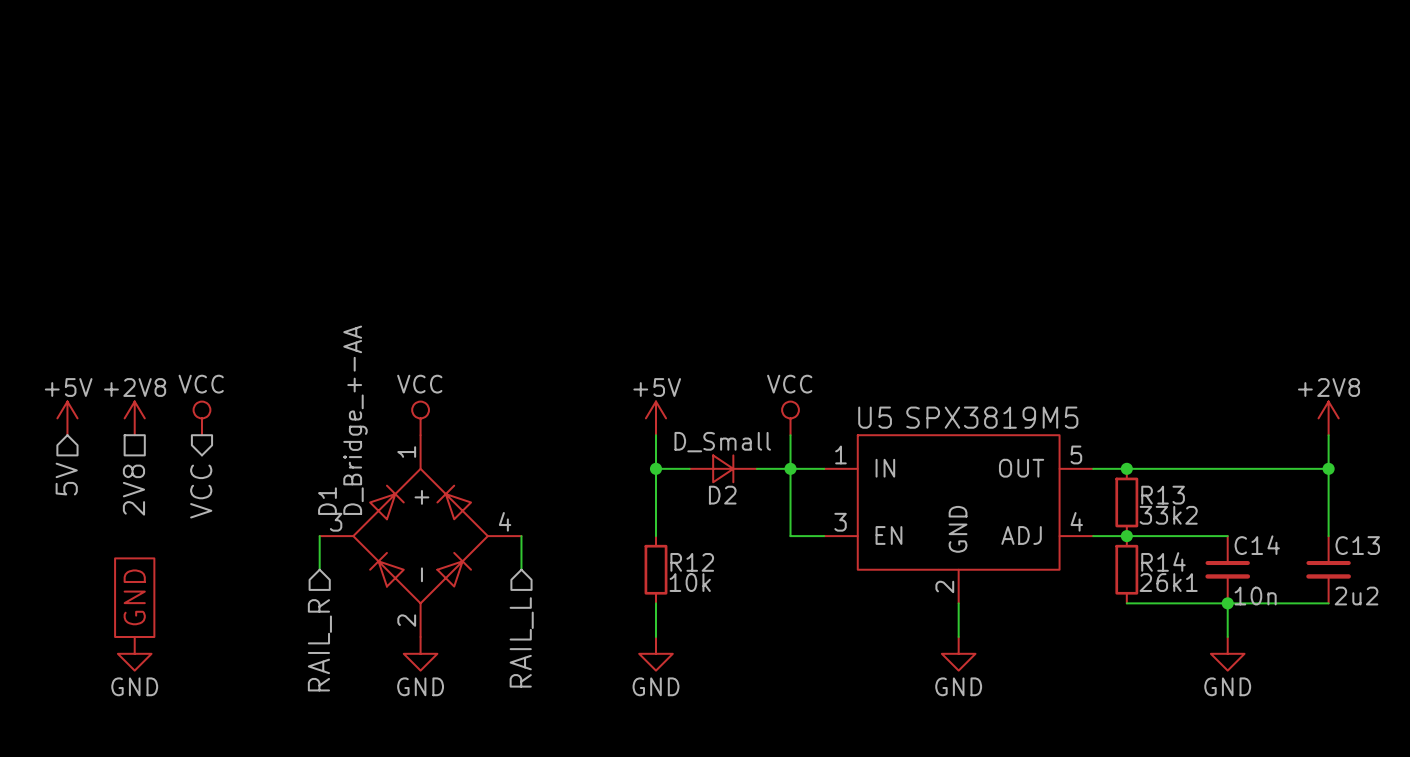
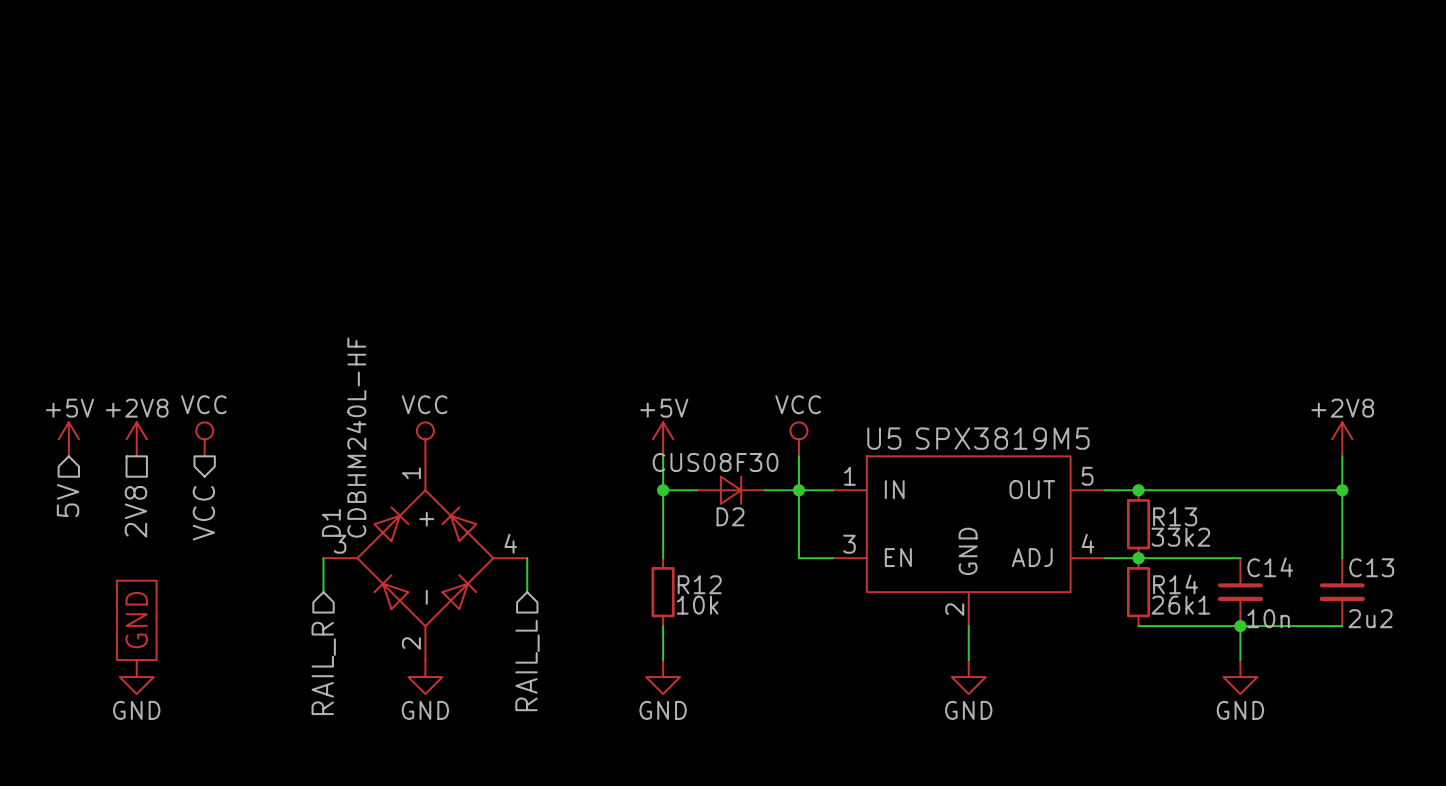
D1 value: D_Bridge_+-AA (355, 420) -> CDBHM240L-HF (356, 437)
D2 value: D_Small (722, 442) -> CUS08F30 (715, 462)

